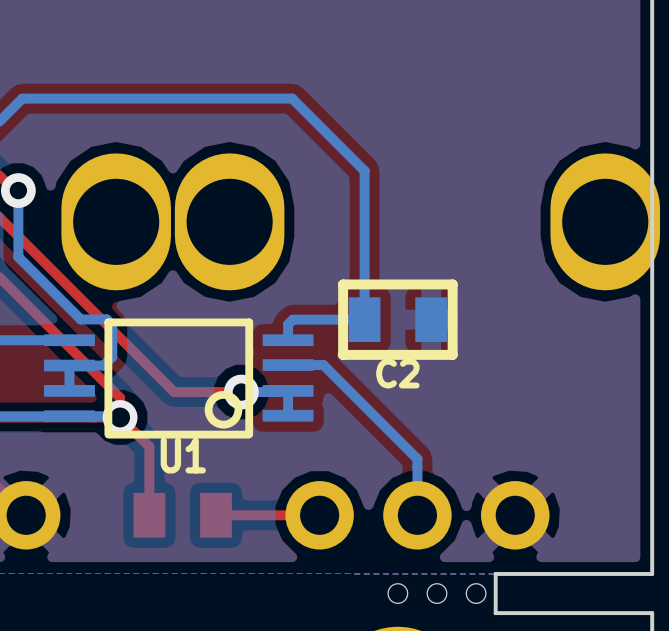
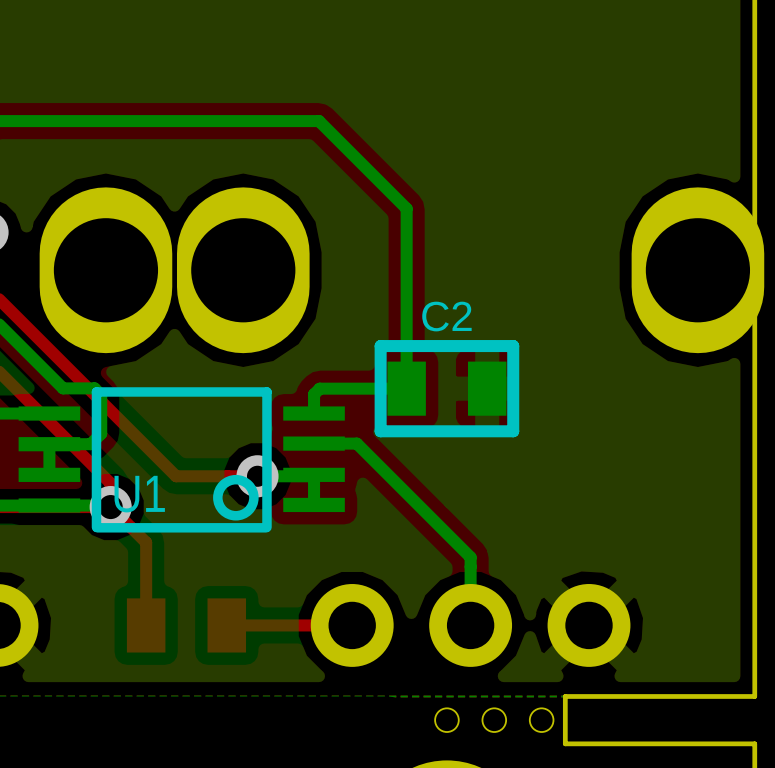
C2 name position: C2 (397, 373) -> C2 (446, 316)
U1 name position: U1 (183, 455) -> U1 (139, 494)

